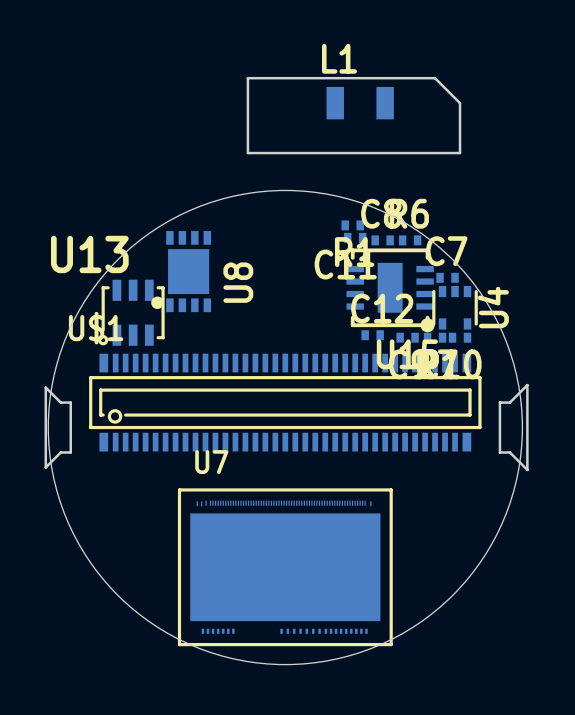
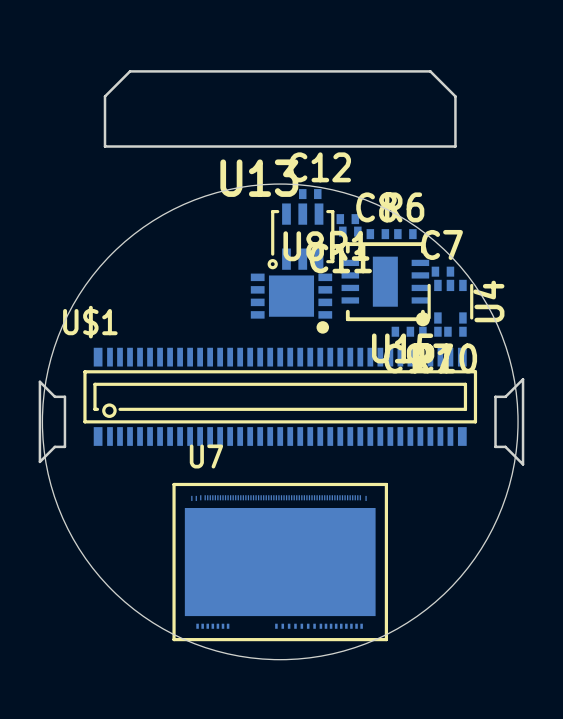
board edge: (247, 78) (247, 153) -> (242, 71) (130, 71) (105, 96) (105, 146) (242, 146)
L1: (360, 103) -> none
U8 rotation: 0° (181, 271) -> 90° counterclockwise (291, 303)
U8 position: (181, 271) -> (291, 303)
U13 position: (131, 312) -> (300, 236)
C12 position: (372, 335) -> (310, 194)

